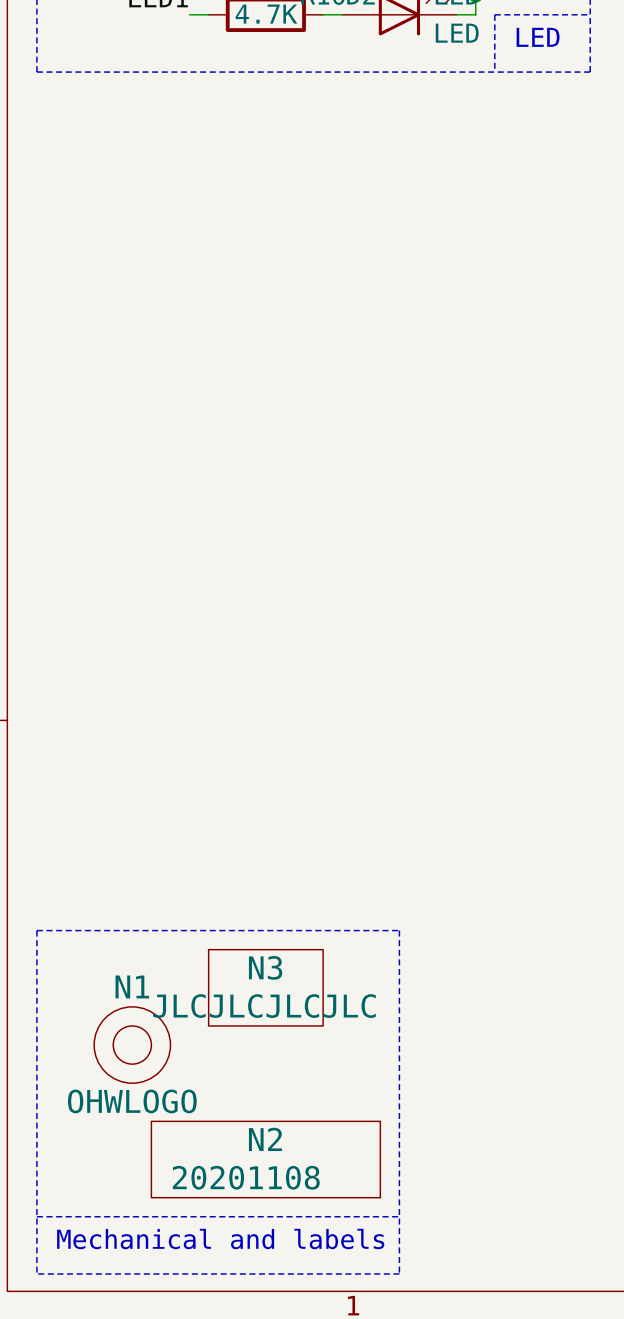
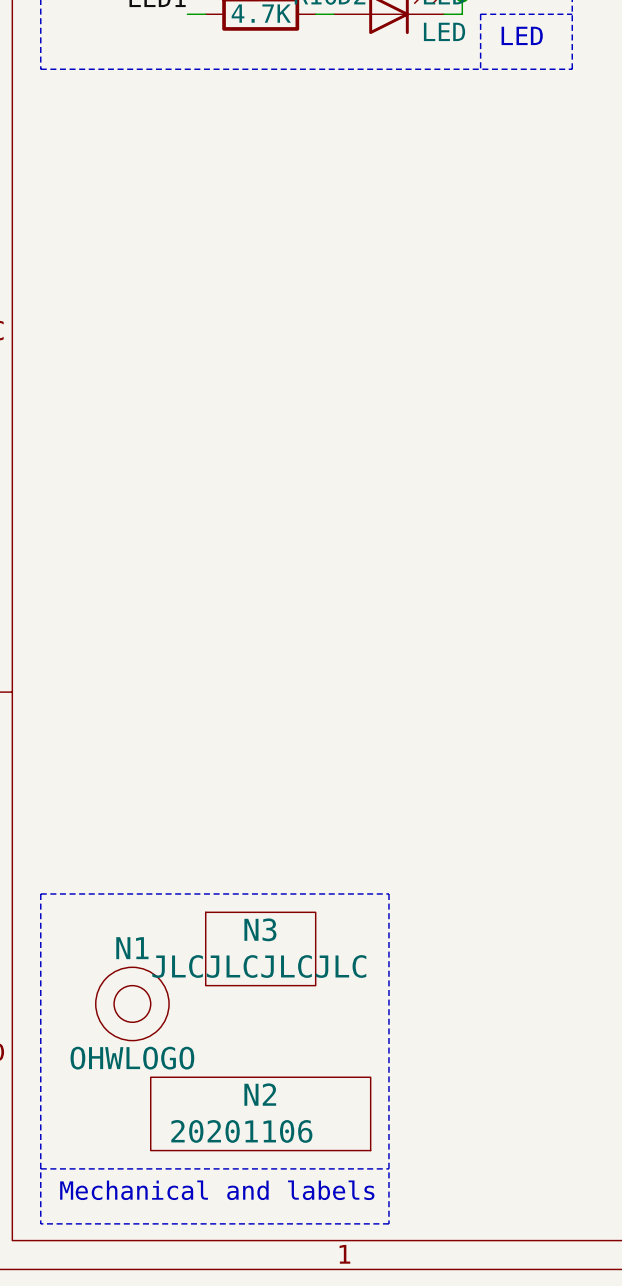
N2 value: 20201108 (246, 1177) -> 20201106 (241, 1131)

